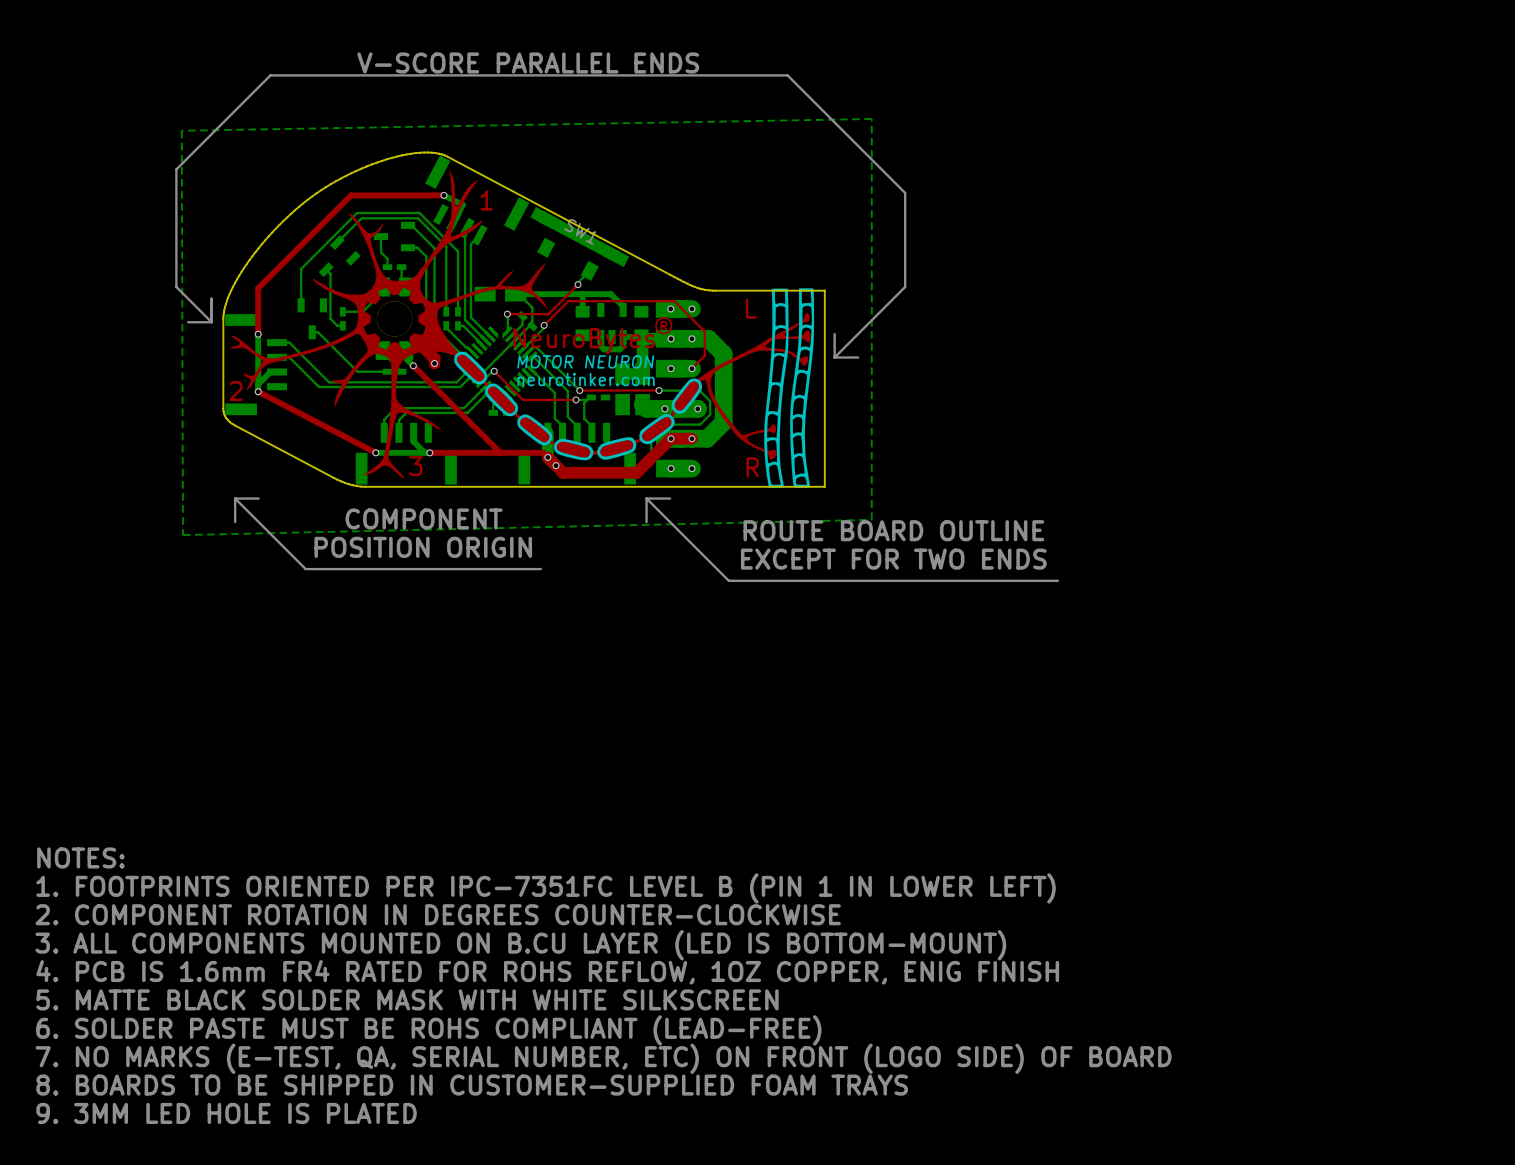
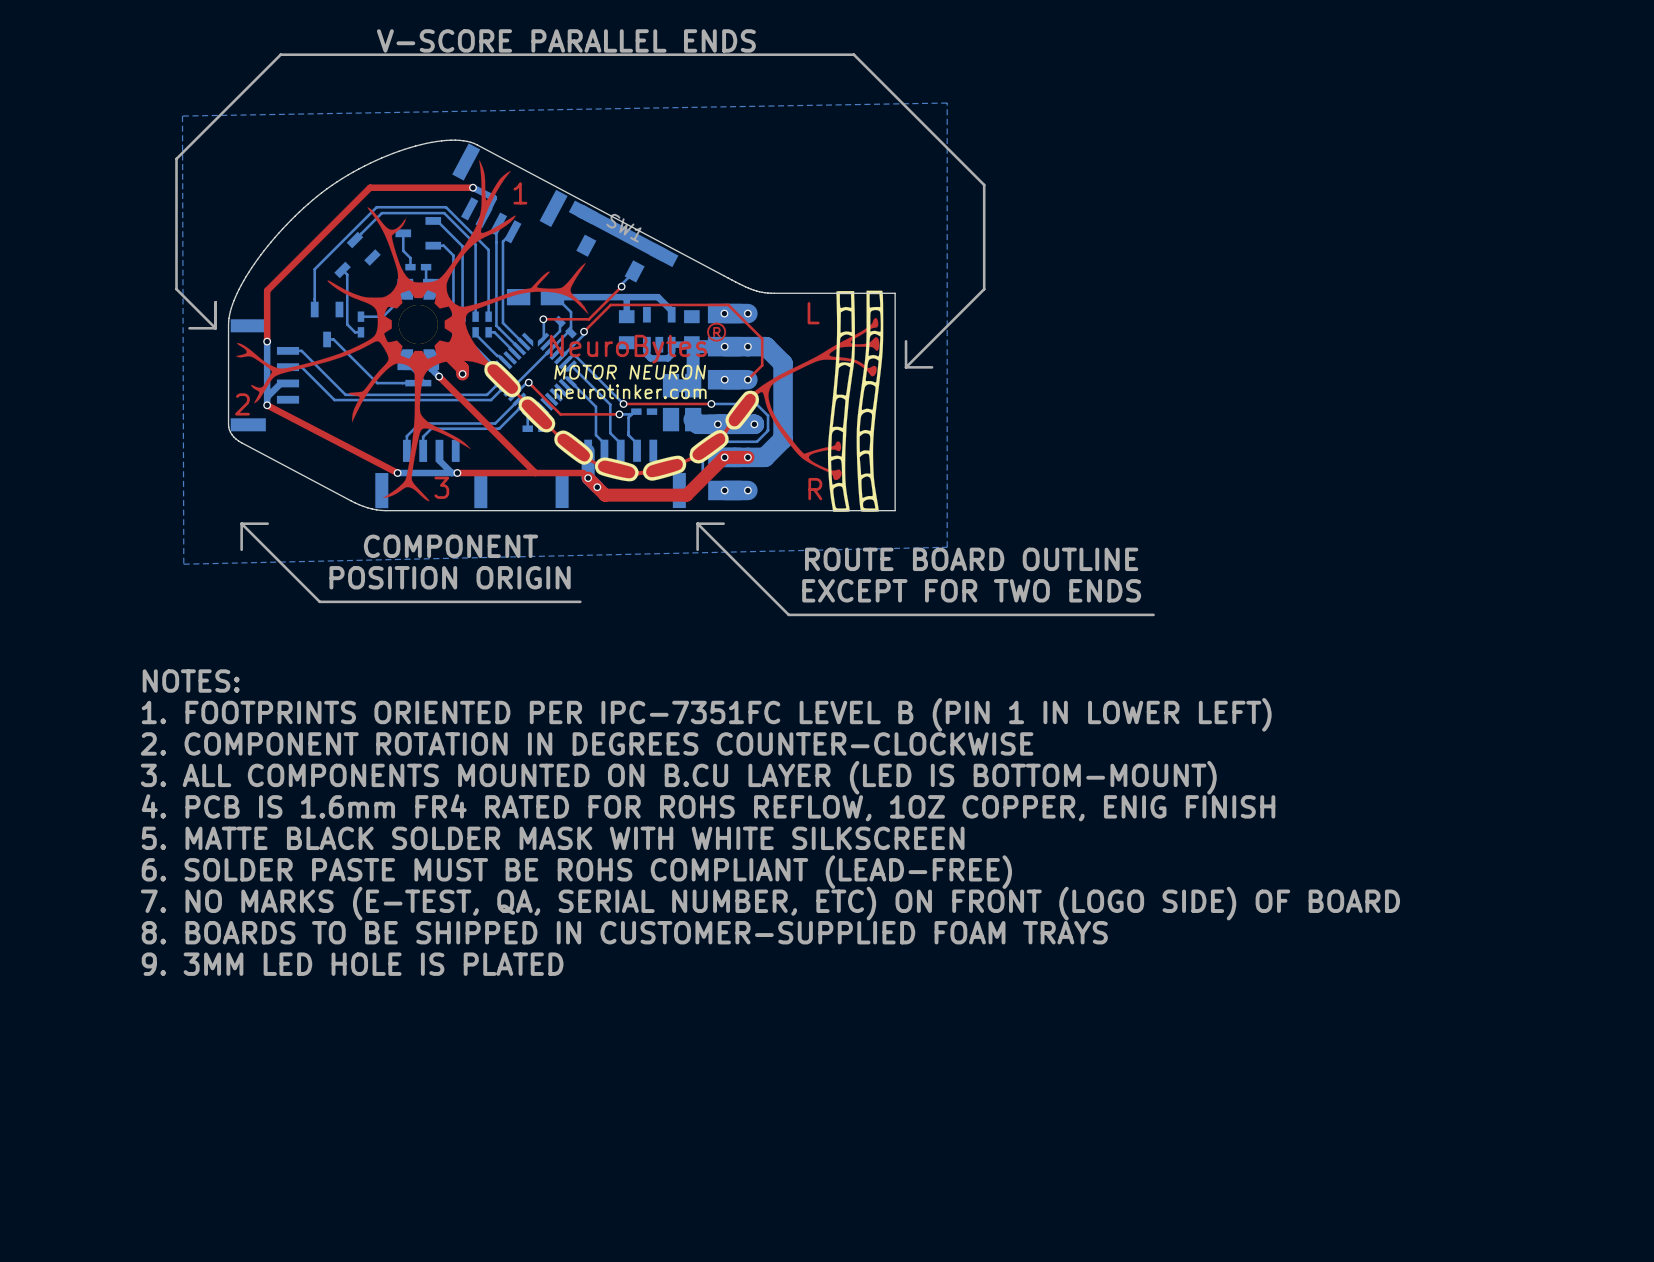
text position: NOTES: (80, 857) -> NOTES: (191, 681)
text position: 1. FOOTPRINTS ORIENTED PER IPC-7351FC LEVEL B (PIN 1 IN LOWER LEFT) (546, 888) -> 1. FOOTPRINTS ORIENTED PER IPC-7351FC LEVEL B (PIN 1 IN LOWER LEFT) (706, 714)
text position: 2. COMPONENT ROTATION IN DEGREES COUNTER-CLOCKWISE (438, 914) -> 2. COMPONENT ROTATION IN DEGREES COUNTER-CLOCKWISE (587, 743)
text position: 3. ALL COMPONENTS MOUNTED ON B.CU LAYER (LED IS BOTTOM-MOUNT) (520, 945) -> 3. ALL COMPONENTS MOUNTED ON B.CU LAYER (LED IS BOTTOM-MOUNT) (678, 777)
text position: 4. PCB IS 1.6mm FR4 RATED FOR ROHS REFLOW, 1OZ COPPER, ENIG FINISH (547, 972) -> 4. PCB IS 1.6mm FR4 RATED FOR ROHS REFLOW, 1OZ COPPER, ENIG FINISH (708, 807)
text position: 5. MATTE BLACK SOLDER MASK WITH WHITE SILKSCREEN (407, 999) -> 5. MATTE BLACK SOLDER MASK WITH WHITE SILKSCREEN (553, 838)
text position: 6. SOLDER PASTE MUST BE ROHS COMPLIANT (LEAD-FREE) (428, 1030) -> 6. SOLDER PASTE MUST BE ROHS COMPLIANT (LEAD-FREE) (576, 872)
text position: 7. NO MARKS (E-TEST, QA, SERIAL NUMBER, ETC) ON FRONT (LOGO SIDE) OF BOARD (603, 1058) -> 7. NO MARKS (E-TEST, QA, SERIAL NUMBER, ETC) ON FRONT (LOGO SIDE) OF BOARD (770, 903)
text position: 8. BOARDS TO BE SHIPPED IN CUSTOMER-SUPPLIED FOAM TRAYS (472, 1085) -> 8. BOARDS TO BE SHIPPED IN CUSTOMER-SUPPLIED FOAM TRAYS (624, 932)
text position: 9. 3MM LED HOLE IS PLATED (226, 1113) -> 9. 3MM LED HOLE IS PLATED (352, 964)

